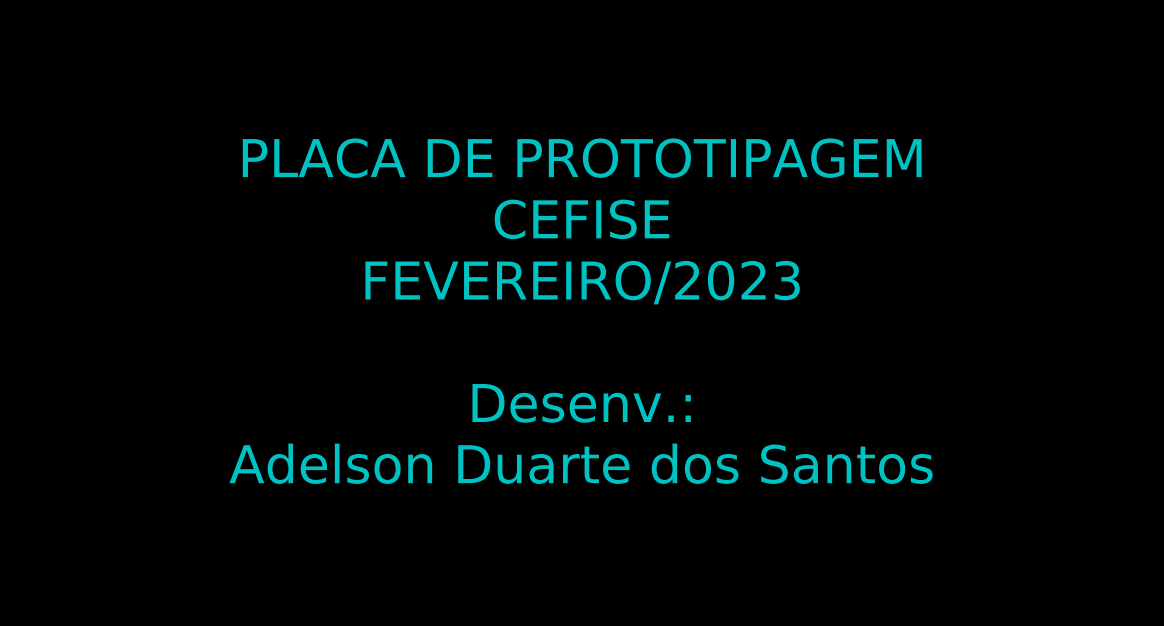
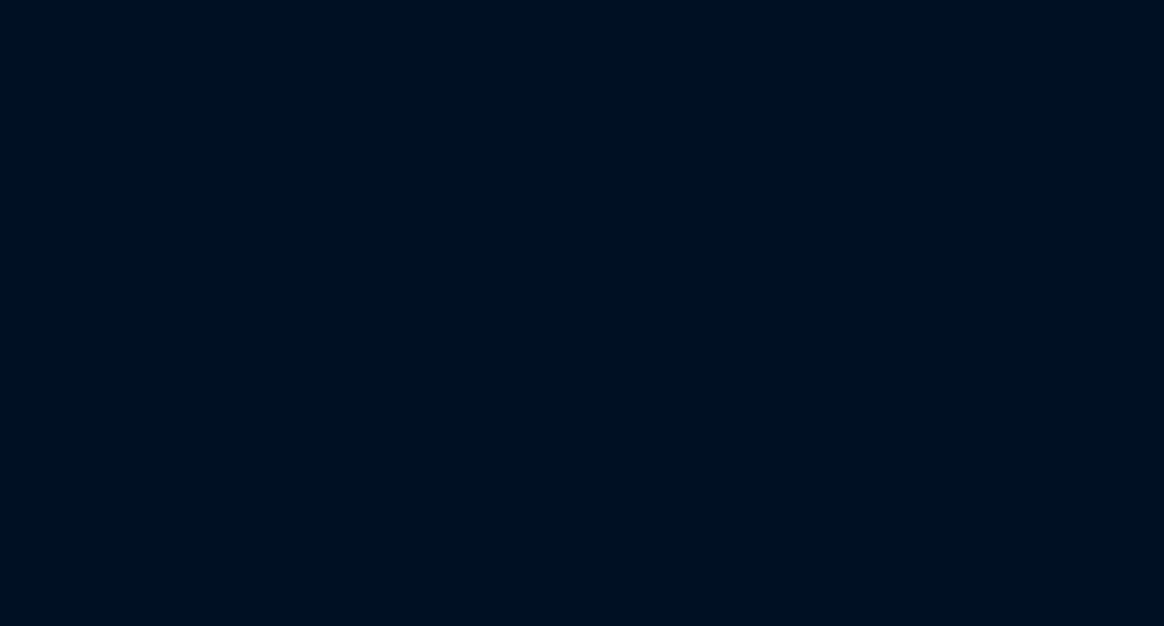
text: PLACA DE PROTOTIPAGEM (582, 158) -> none
text: CEFISE (581, 219) -> none
text: FEVEREIRO/2023 (582, 282) -> none
text: Desenv.: (581, 403) -> none
text: Adelson Duarte dos Santos (581, 463) -> none

